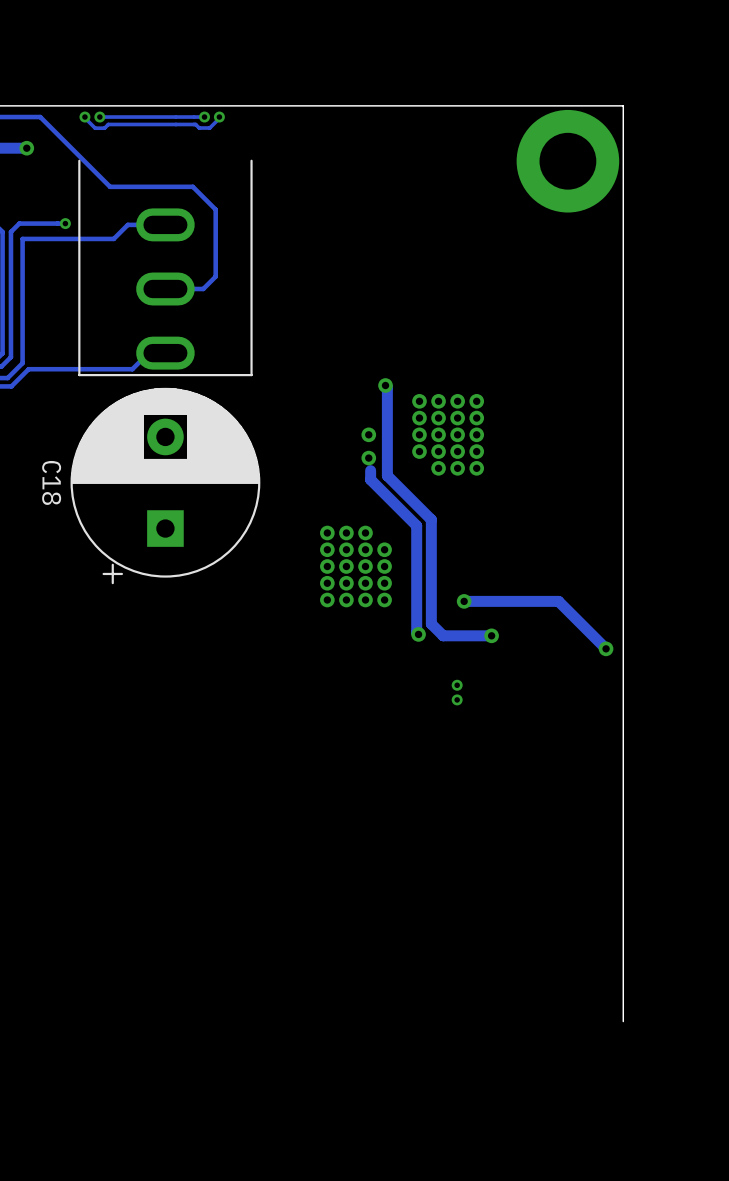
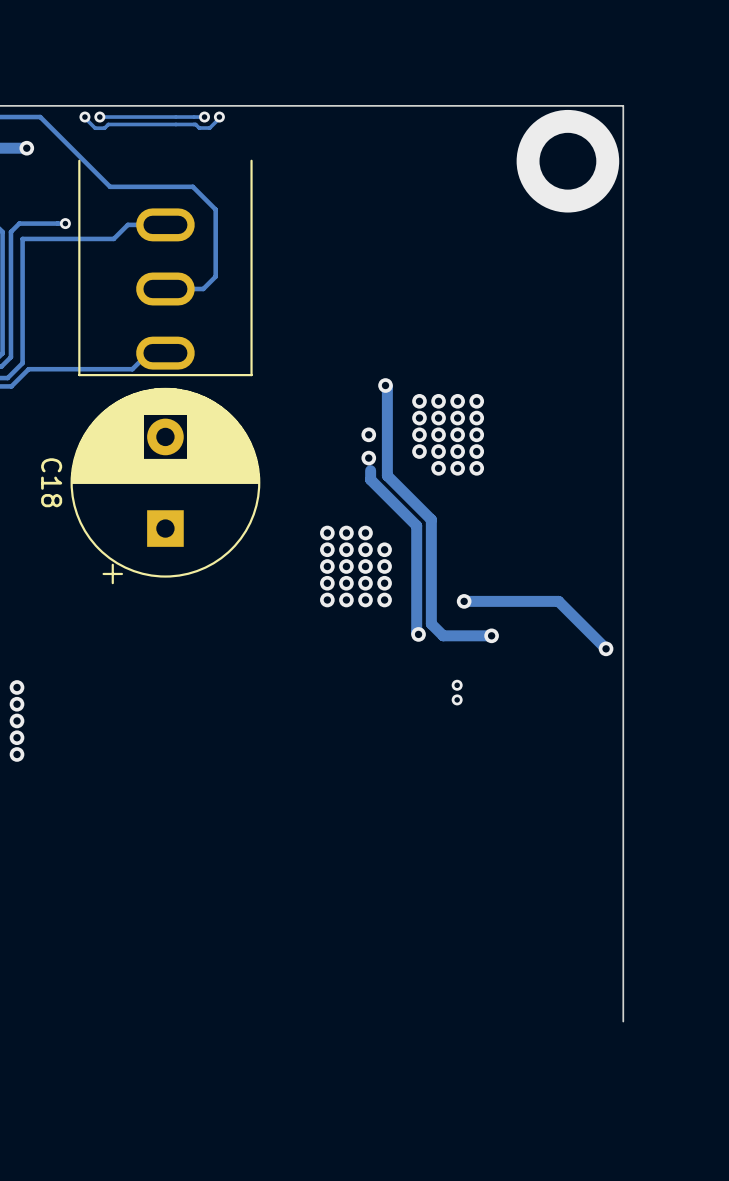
via: none -> (17, 687)
via: none -> (17, 704)
via: none -> (17, 720)
via: none -> (17, 737)
via: none -> (17, 754)

